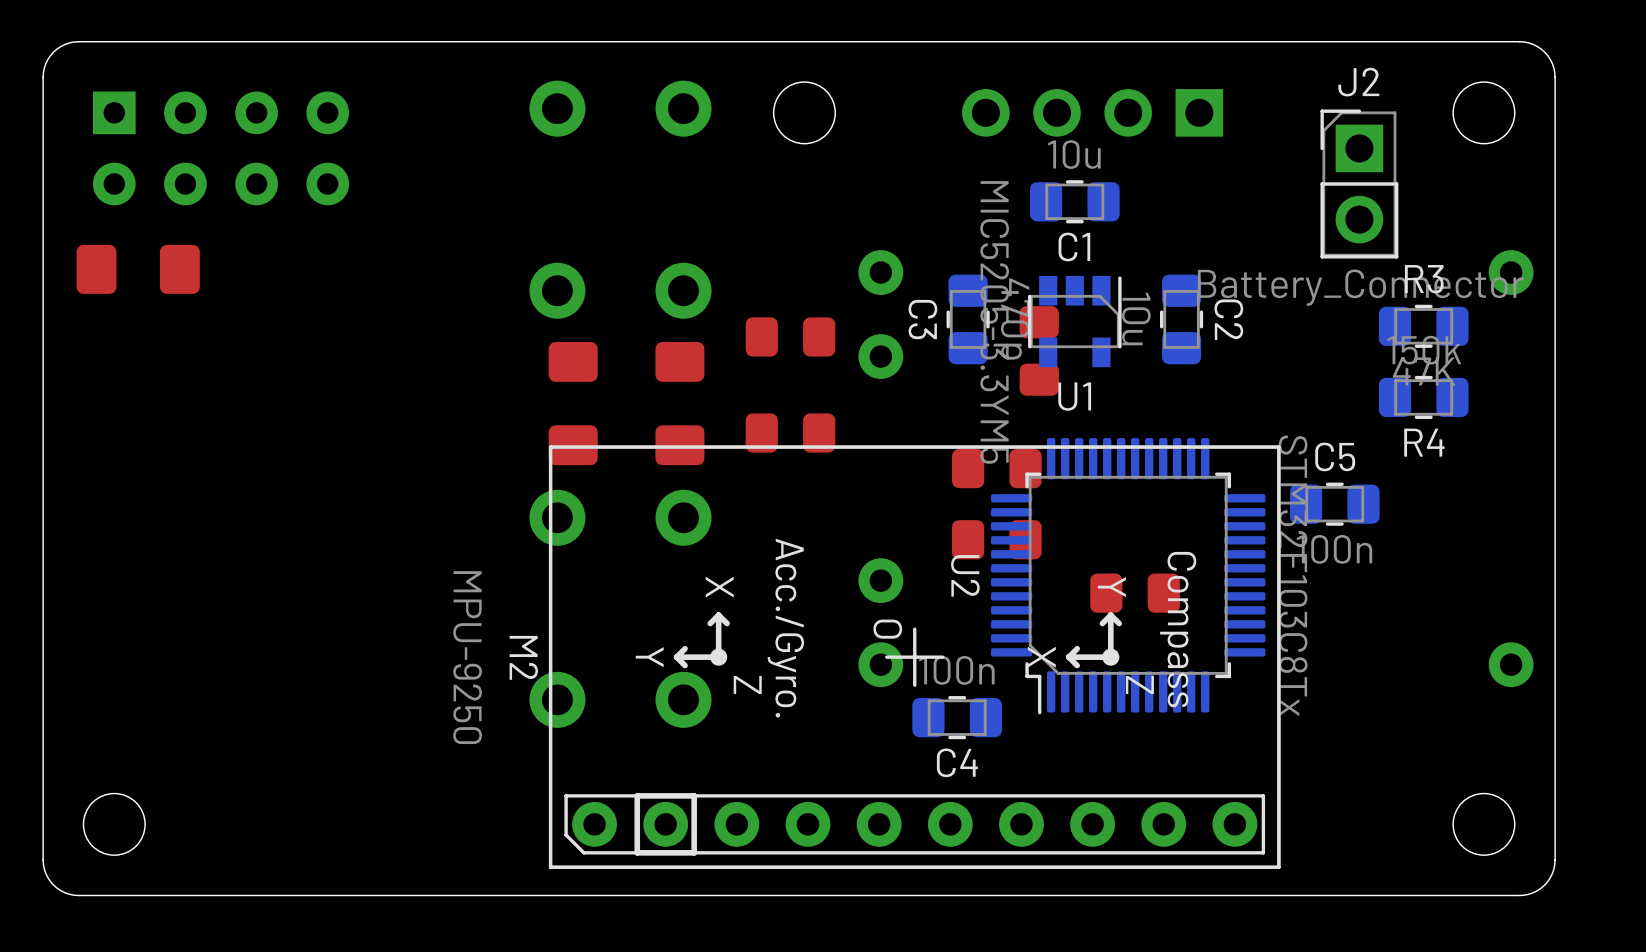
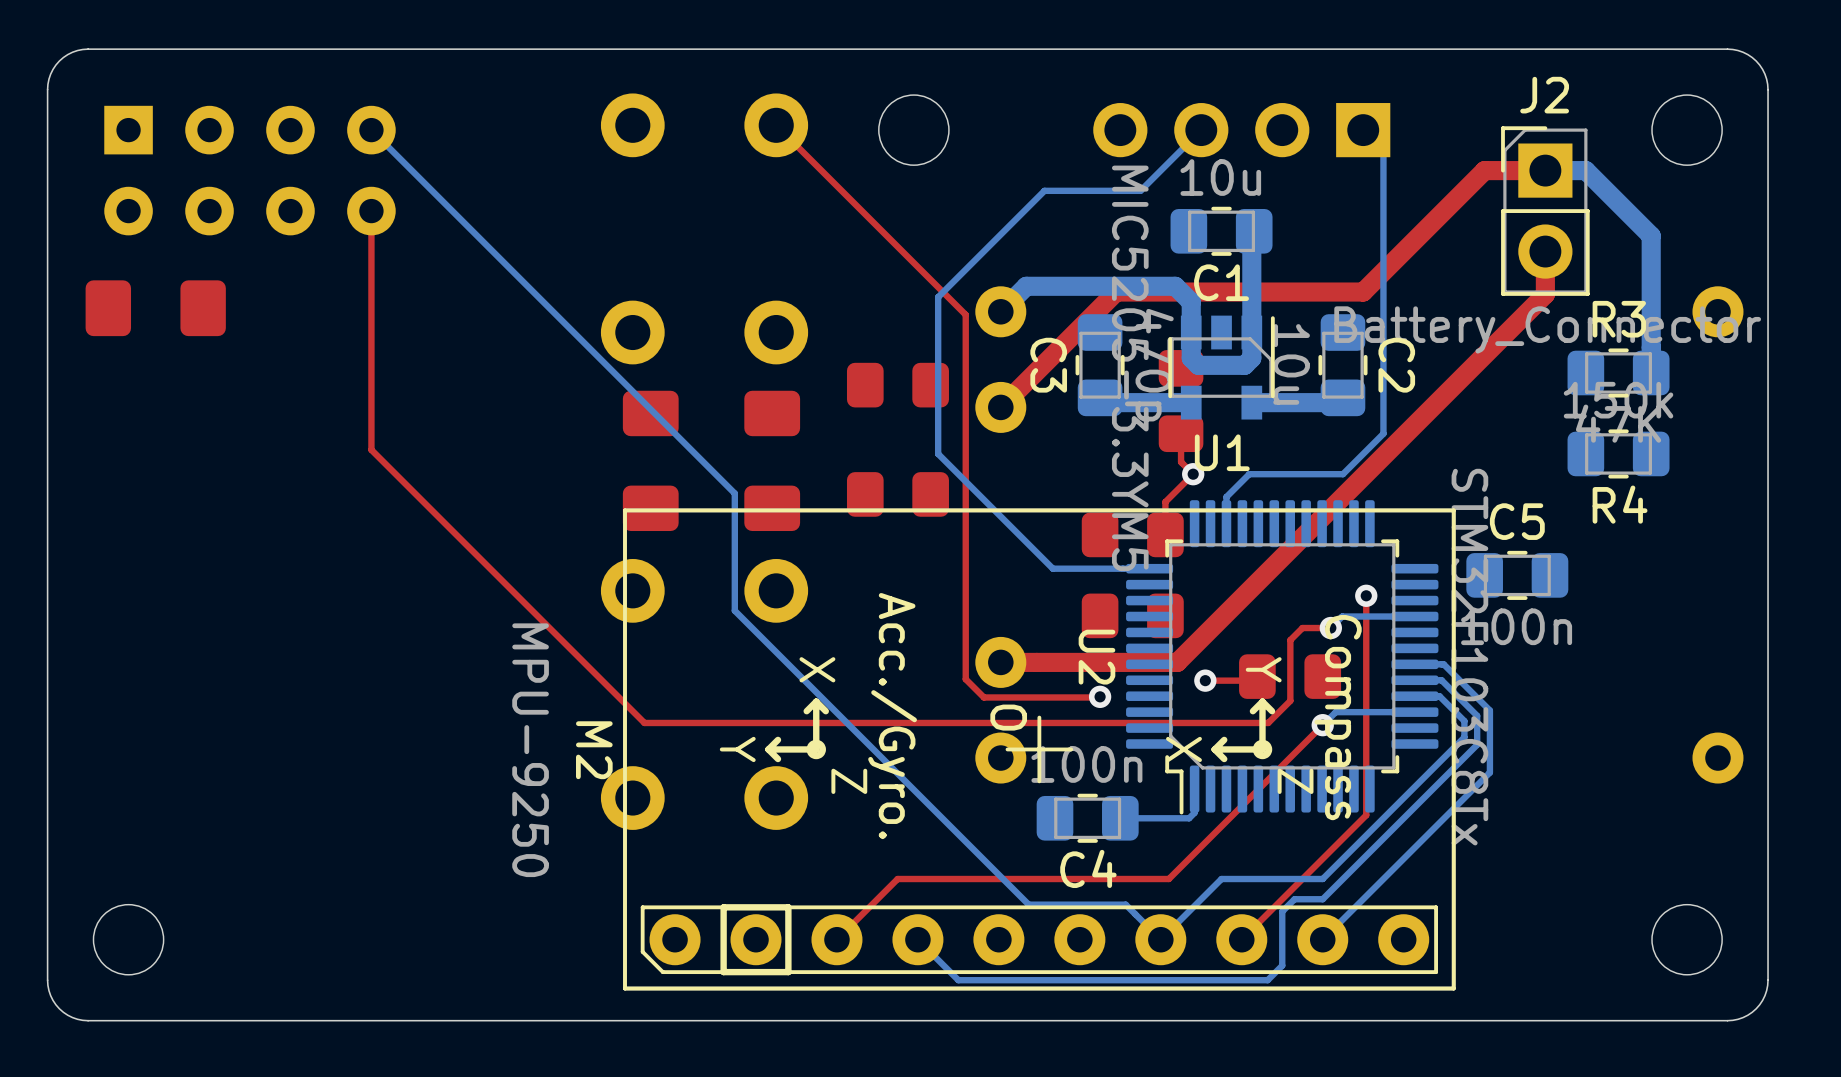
top track: none -> (776, 125) (965, 314) (965, 679) (983, 697) (1100, 696)
bottom track: none -> (371, 130) (734, 493) (734, 610) (1028, 904) (1125, 904) (1160, 939) (1221, 879) (1322, 879) (1464, 737) (1464, 721) (1439, 696) (1414, 696)
bottom track: none -> (1201, 130) (1140, 190) (1044, 190) (938, 297) (938, 453) (1052, 568) (1149, 568)
bottom track: none -> (1363, 130) (1383, 150) (1383, 433) (1342, 474) (1249, 474) (1226, 496) (1226, 523)
bottom track: none -> (1545, 170) (1585, 170) (1651, 235) (1651, 372)
top track: none -> (1545, 170) (1484, 170) (1363, 292) (1116, 292) (1000, 407)
top track: none -> (371, 211) (371, 449) (644, 722) (1268, 722) (1290, 700) (1290, 640) (1302, 628) (1330, 628)
bottom track: none -> (1254, 231) (1251, 233) (1251, 358) (1244, 365) (1198, 365) (1191, 358) (1191, 302) (1175, 286) (1026, 286) (1000, 311)
top track: none -> (1545, 251) (1545, 294) (1177, 662) (1000, 662)
bottom track: none -> (1100, 397) (1104, 402) (1191, 402)
bottom track: none -> (1342, 397) (1338, 402) (1251, 402)
top track: none -> (1181, 433) (1181, 462) (1193, 474) (1165, 501) (1165, 534)
via: none -> (1193, 474)
top track: none -> (1366, 595) (1366, 815) (1241, 939)
via: none -> (1366, 595)
bottom track: none -> (1414, 616) (1342, 616) (1330, 628)
via: none -> (1330, 628)
bottom track: none -> (1414, 664) (1443, 664) (1489, 710) (1489, 772) (1322, 939)
top track: none -> (1257, 676) (1253, 680) (1205, 680)
via: none -> (1205, 680)
bottom track: none -> (1414, 680) (1441, 680) (1477, 715) (1477, 744) (1322, 899) (1294, 899) (1282, 911) (1282, 965) (1267, 980) (958, 980) (917, 939)
via: none -> (1100, 696)
bottom track: none -> (1414, 712) (1335, 712) (1322, 725)
top track: none -> (1322, 725) (1168, 879) (897, 879) (836, 939)
via: none -> (1322, 725)
bottom track: none -> (1194, 789) (1194, 812) (1189, 818) (1120, 818)

